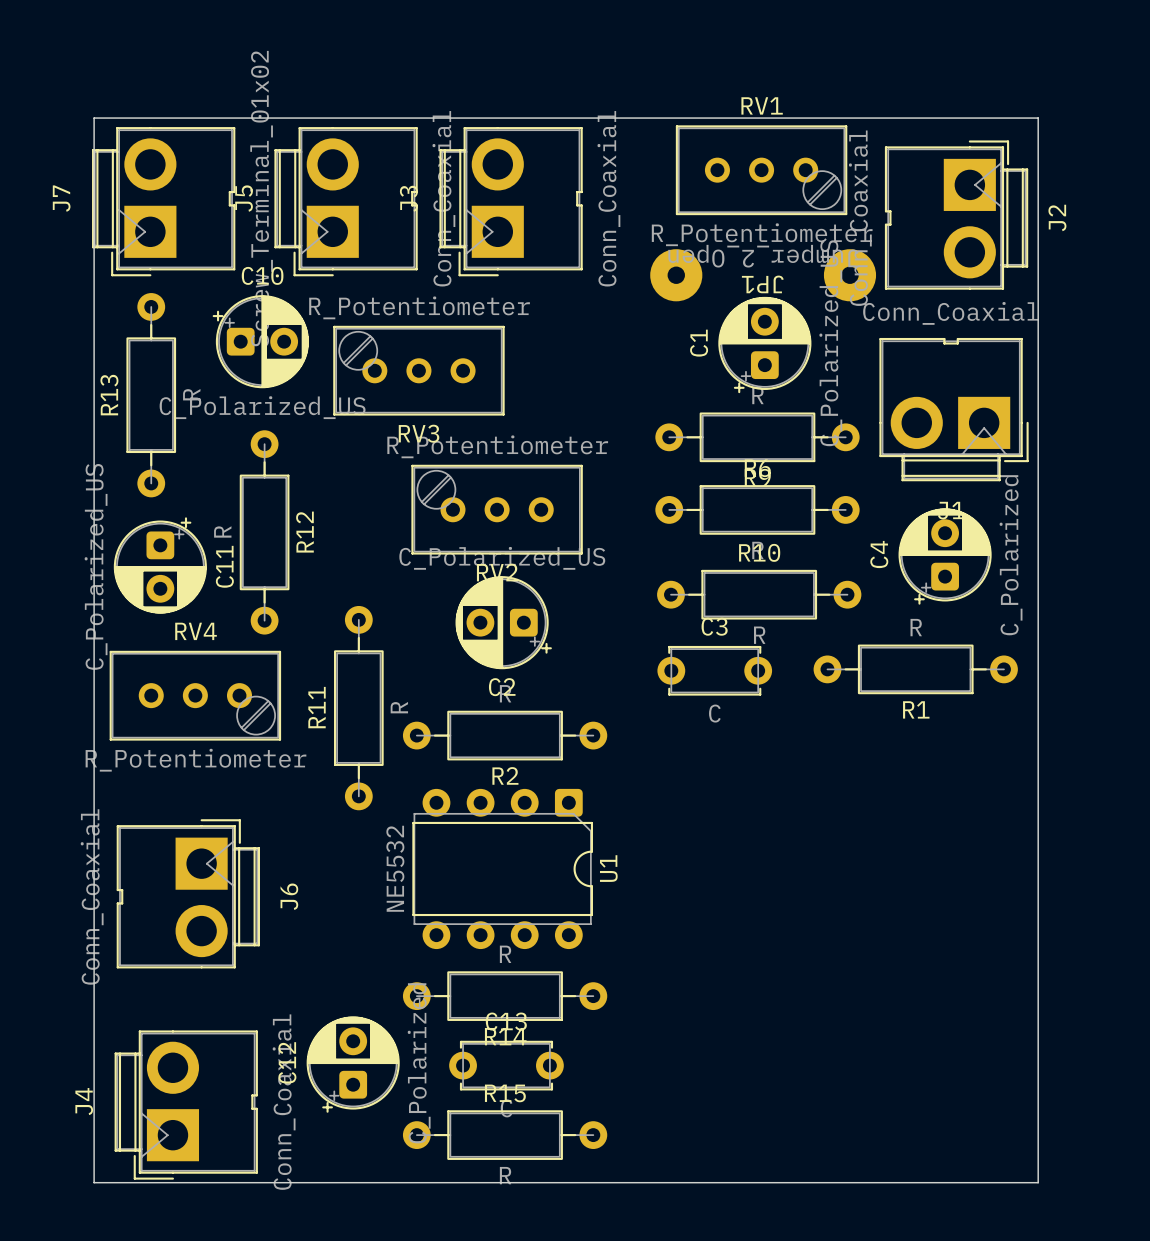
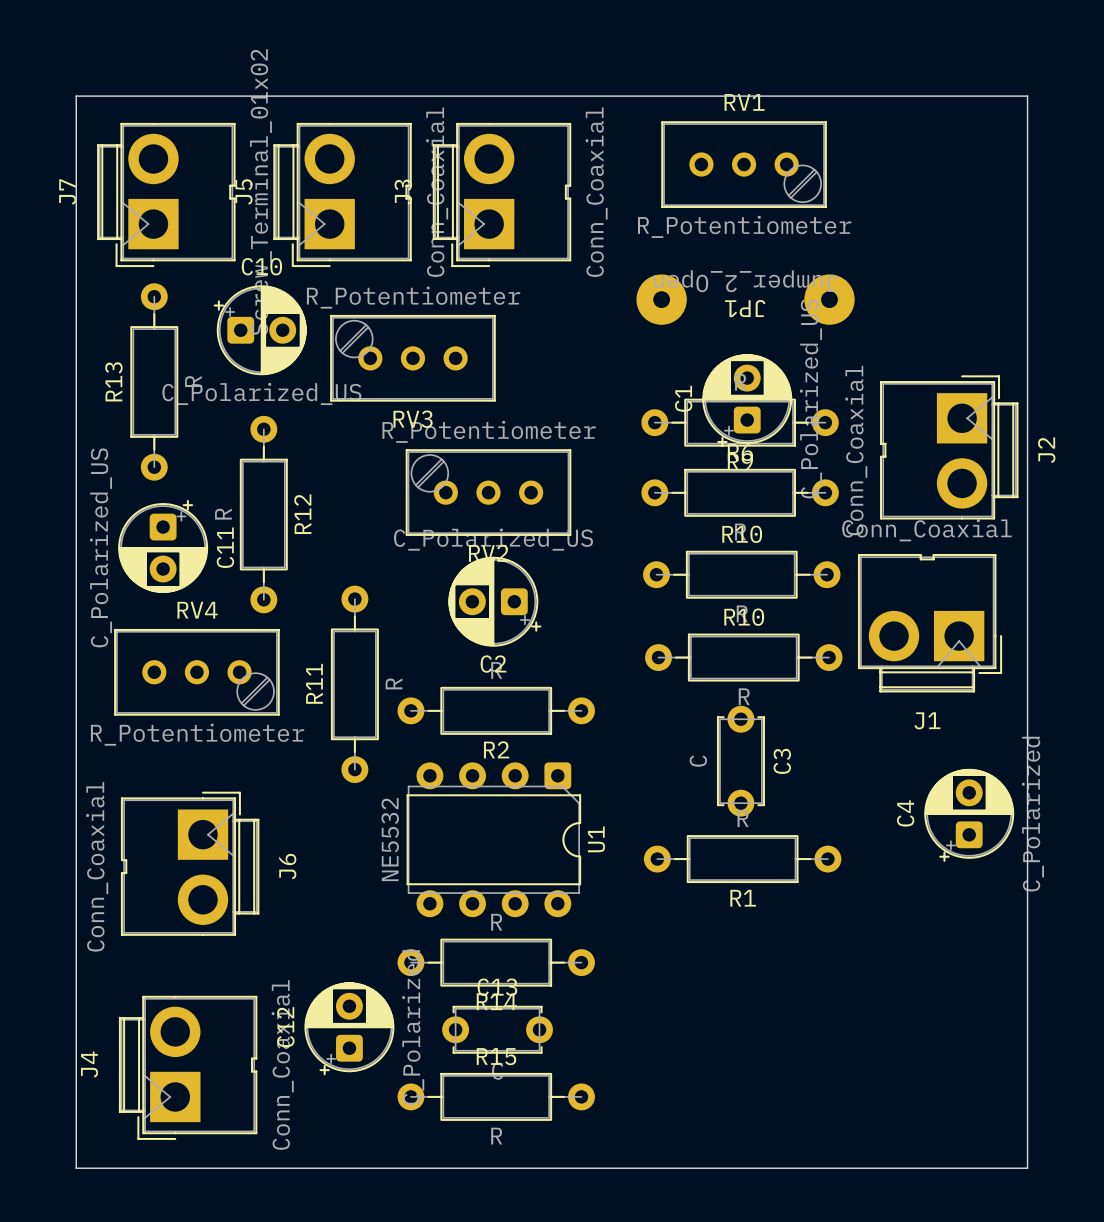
board edge: (94, 118) (1038, 118) (1038, 1182) (94, 1182) (94, 118) -> (76, 96) (76, 1168) (1027, 1168) (1027, 96) (76, 96)
J2 position: (956, 215) -> (949, 447)
JP1 position: (763, 275) -> (745, 299)
C1 position: (764, 345) -> (747, 400)
J1 position: (954, 409) -> (930, 623)
C4 position: (945, 556) -> (969, 815)
R1 position: (915, 669) -> (742, 859)
C3 rotation: 0° (714, 670) -> 90° clockwise (740, 761)
C3 position: (714, 670) -> (740, 761)
R10: none -> R (743, 657)

